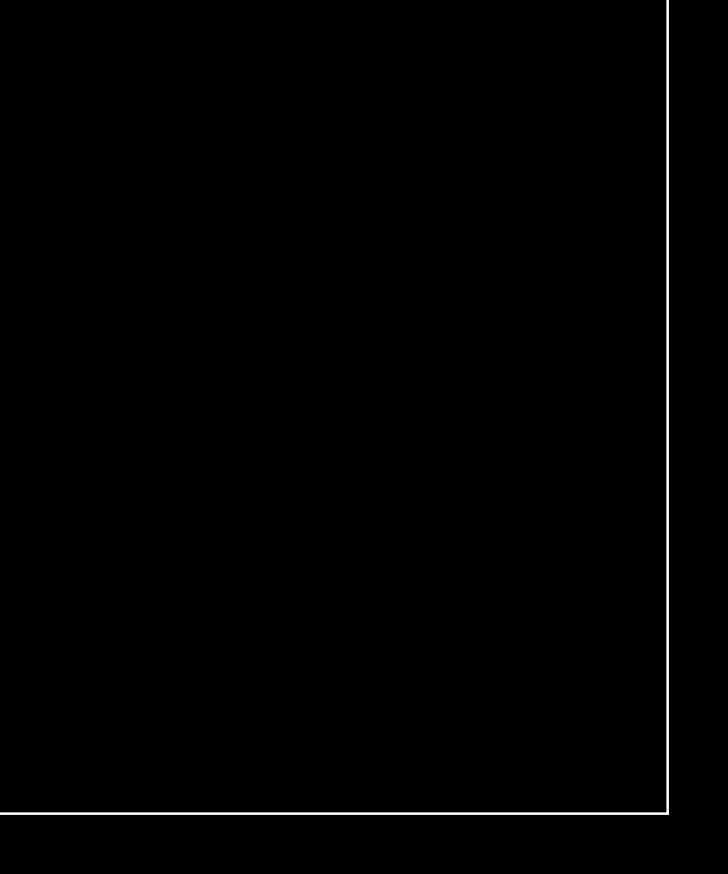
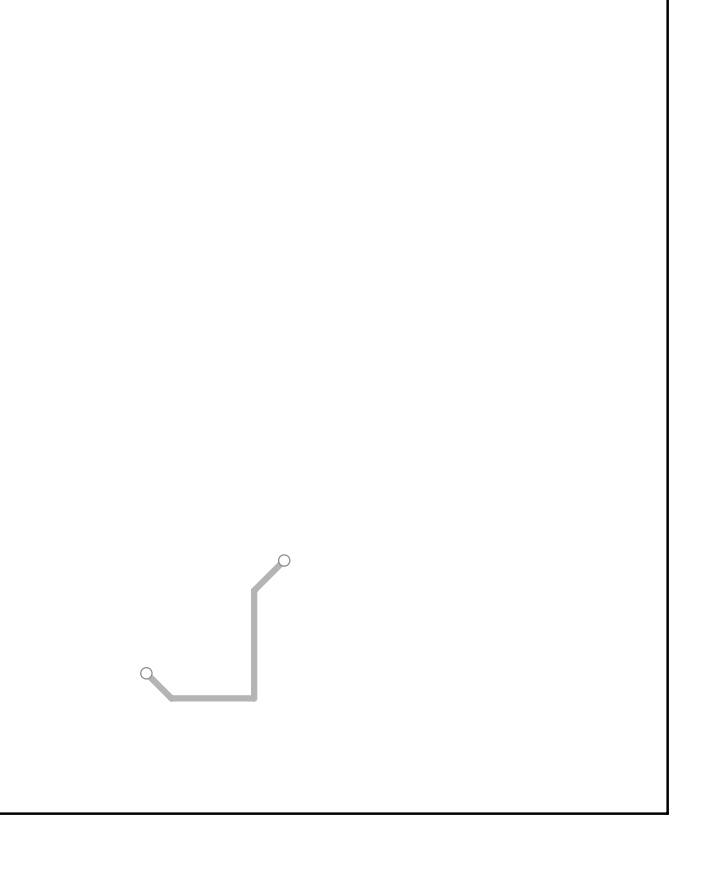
track: none -> (284, 560) (254, 590) (254, 698) (171, 698) (146, 673)
via: none -> (284, 560)
via: none -> (146, 673)

